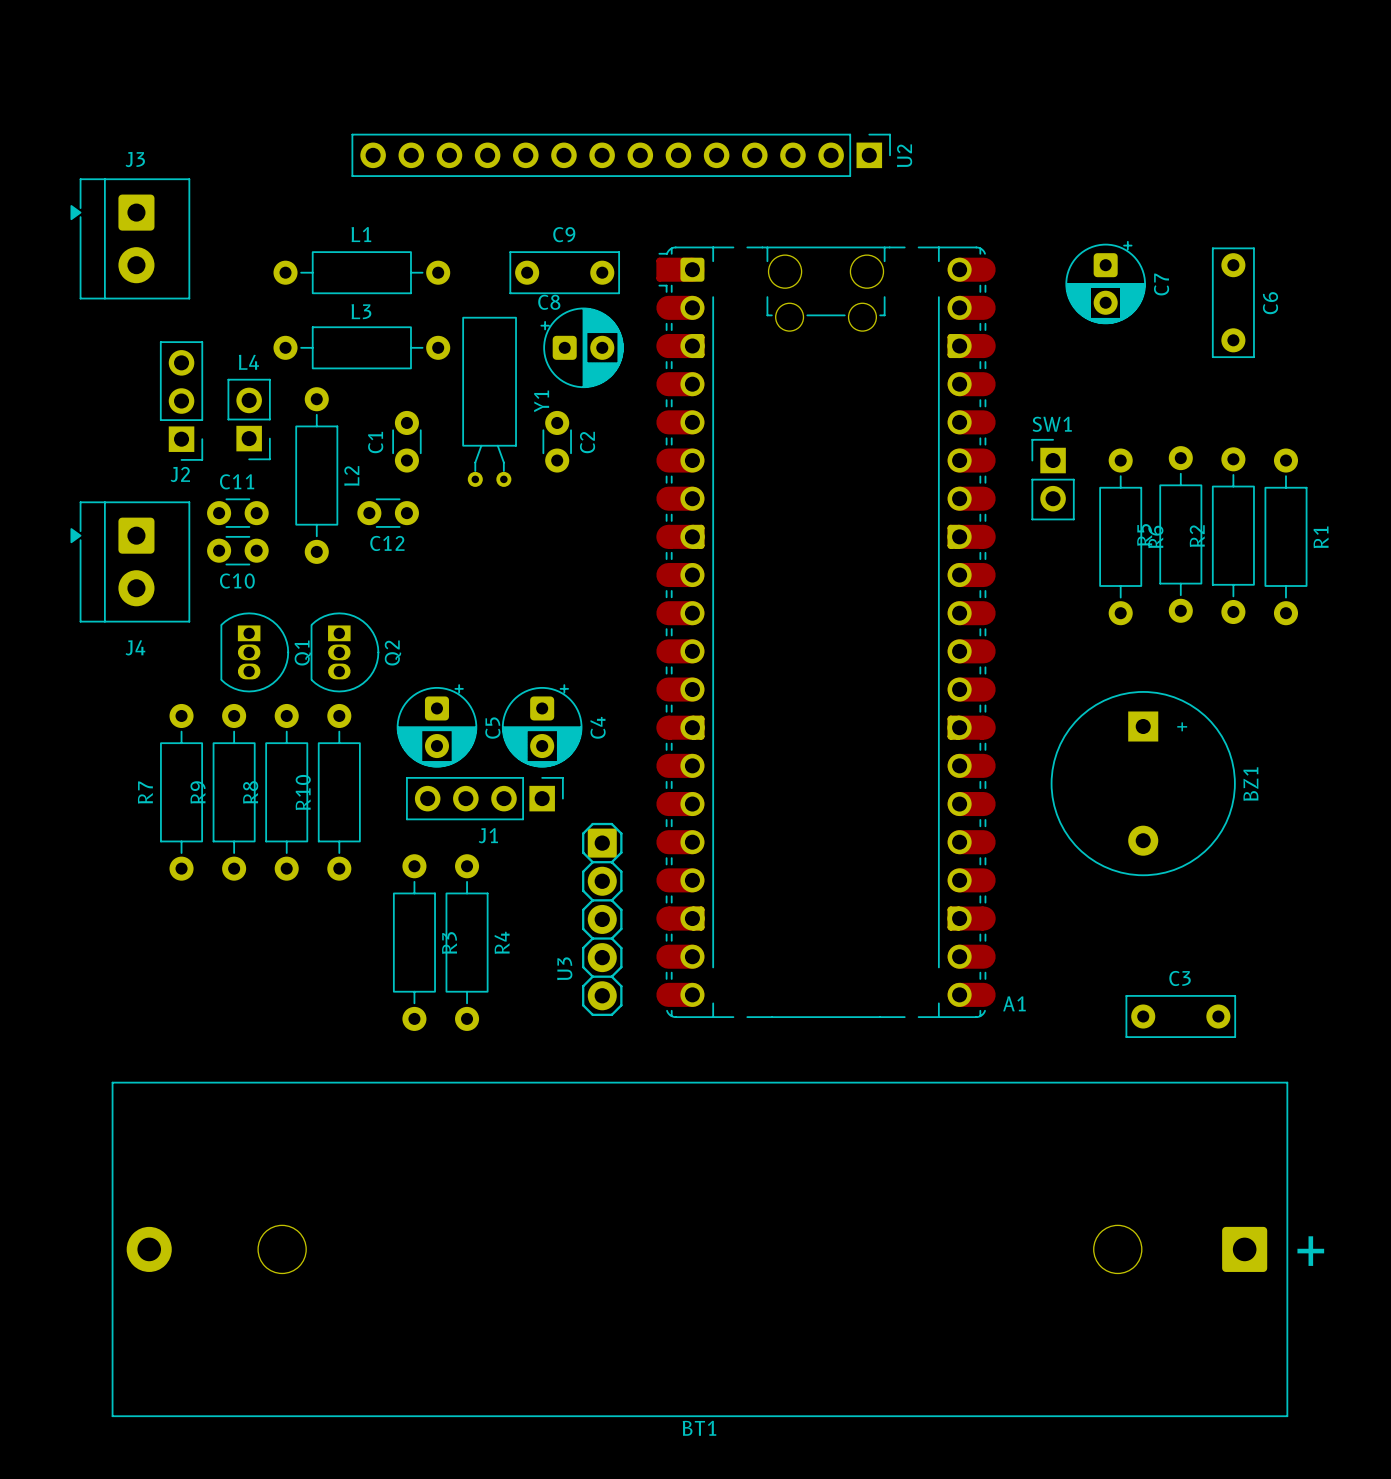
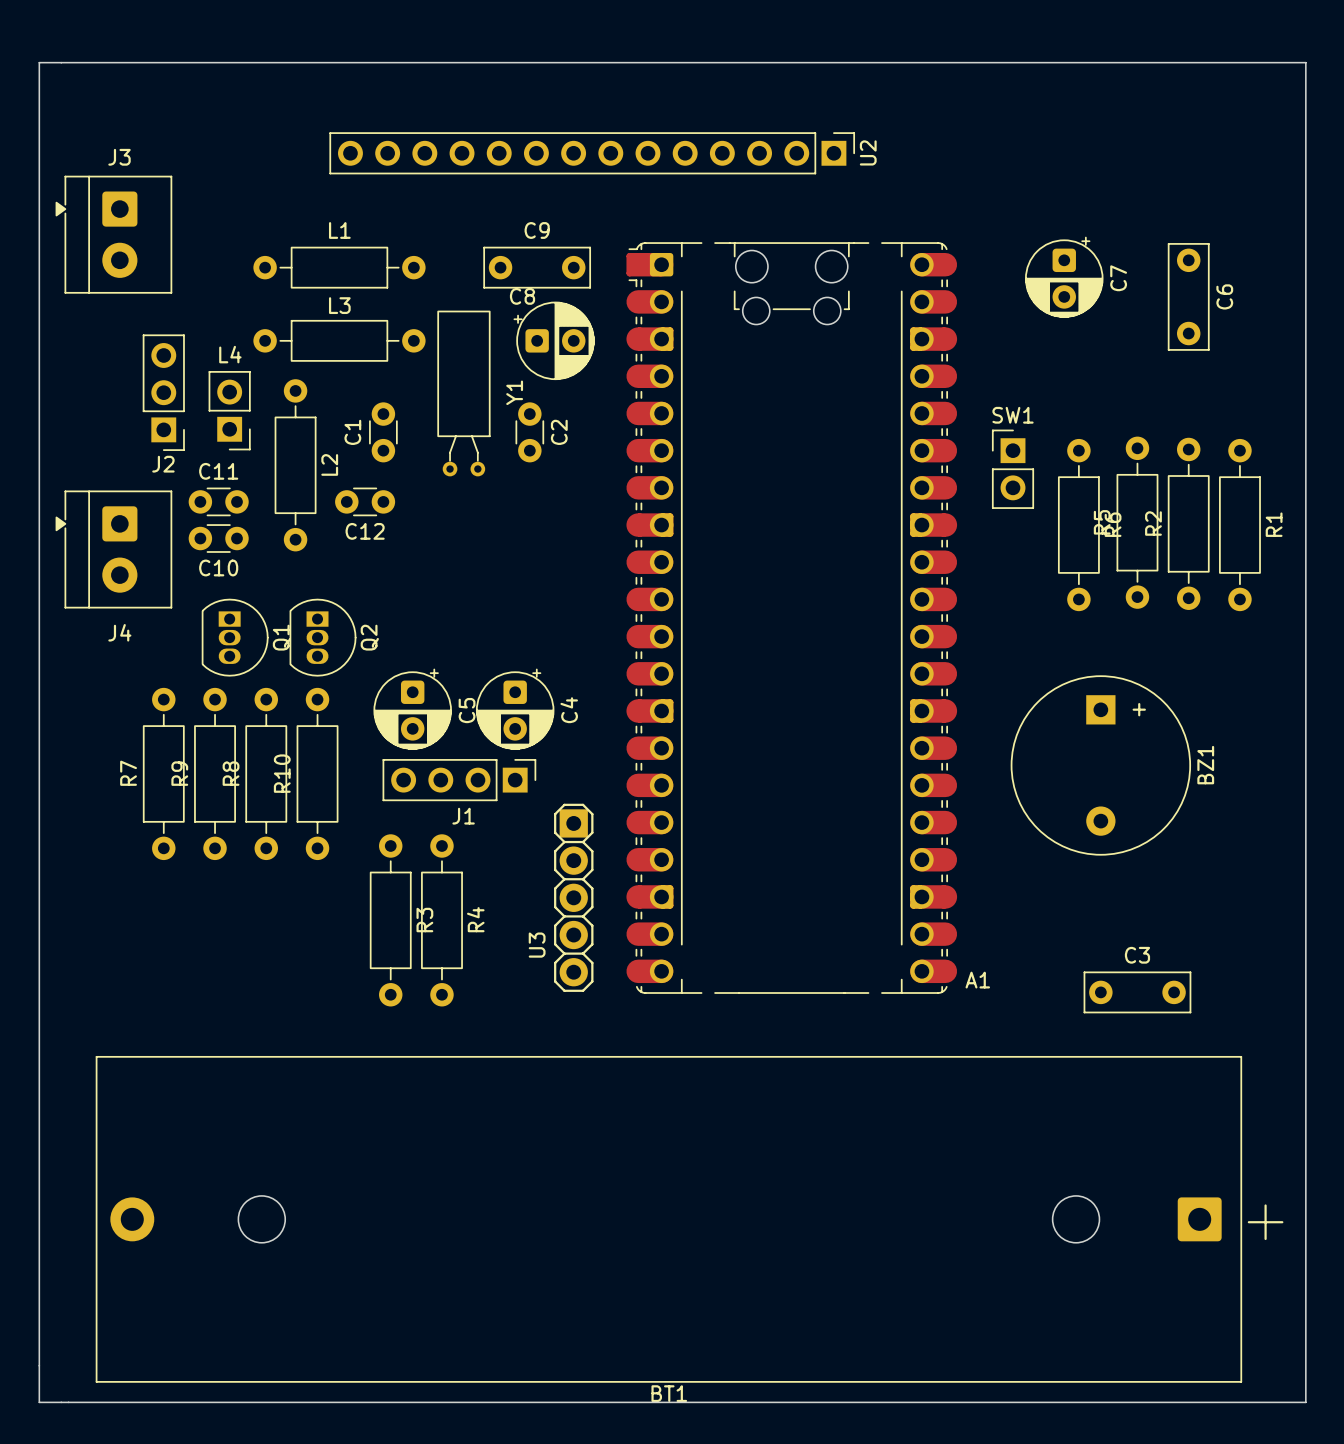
board edge: none -> (39, 62) (39, 1402) (1305, 1402) (1305, 62) (39, 62)

